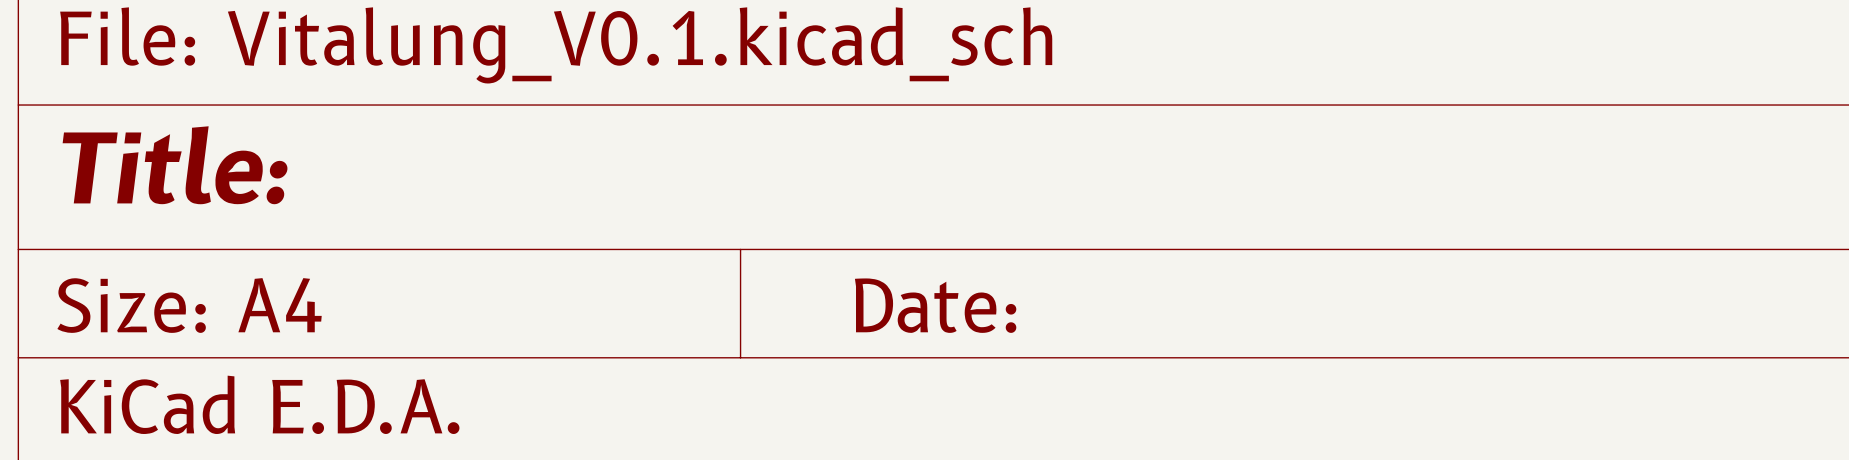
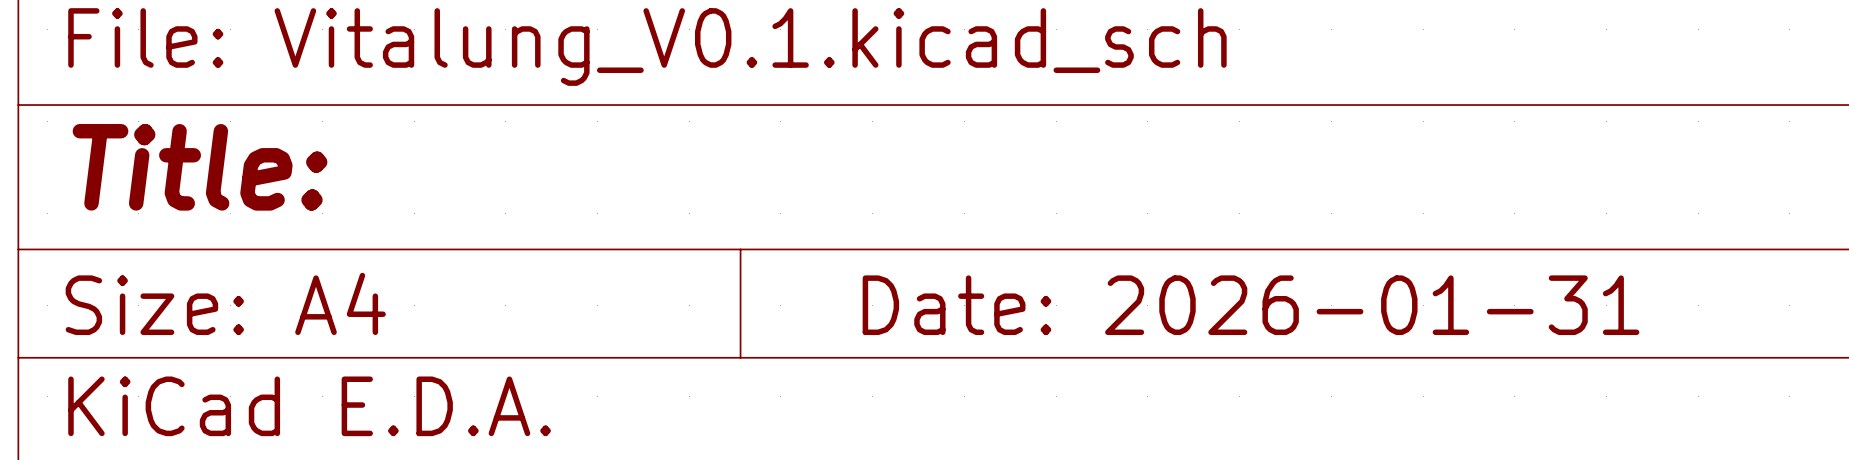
title block: Date: (935, 305) -> Date: 2026-01-31 (1251, 305)

